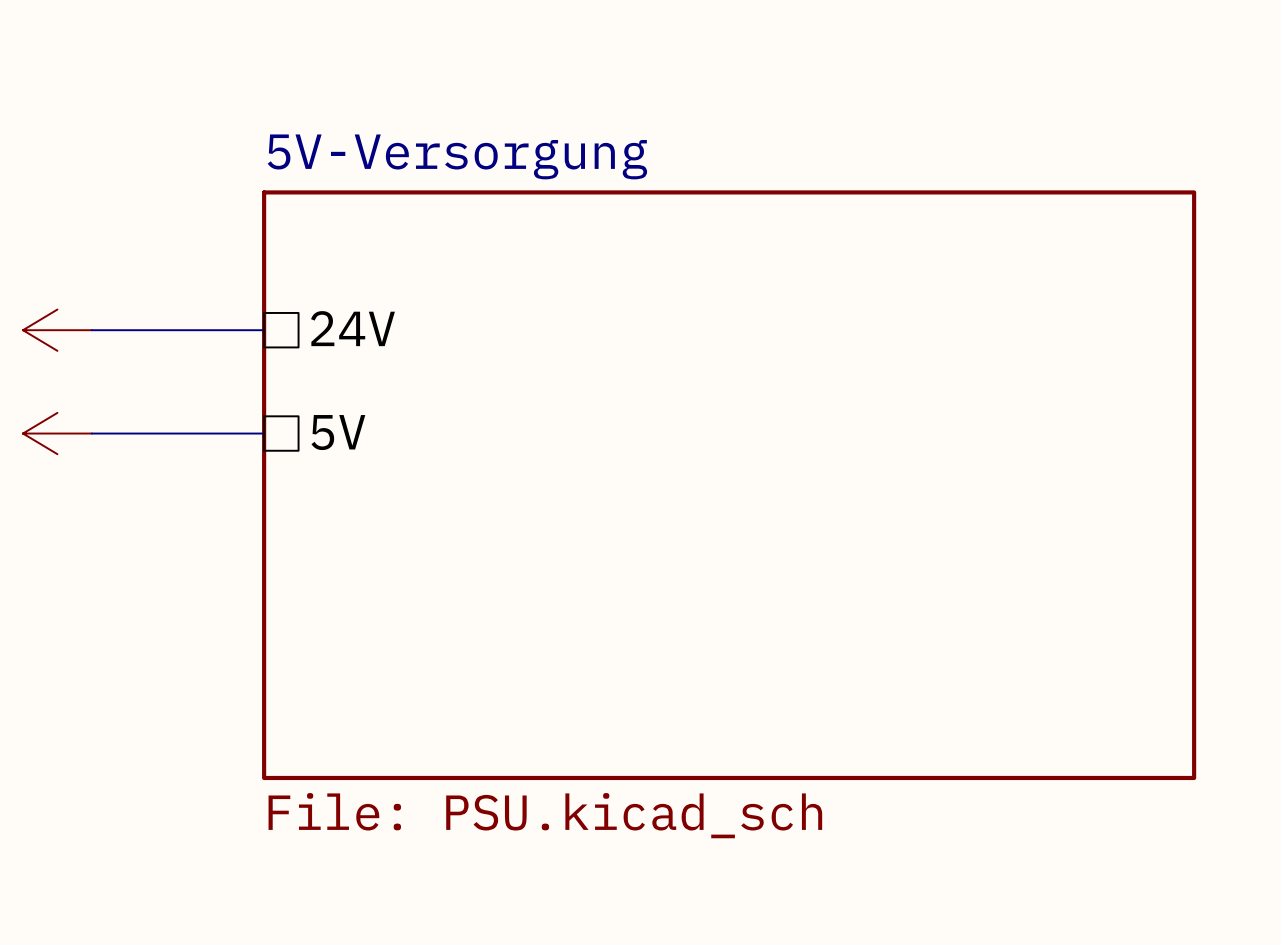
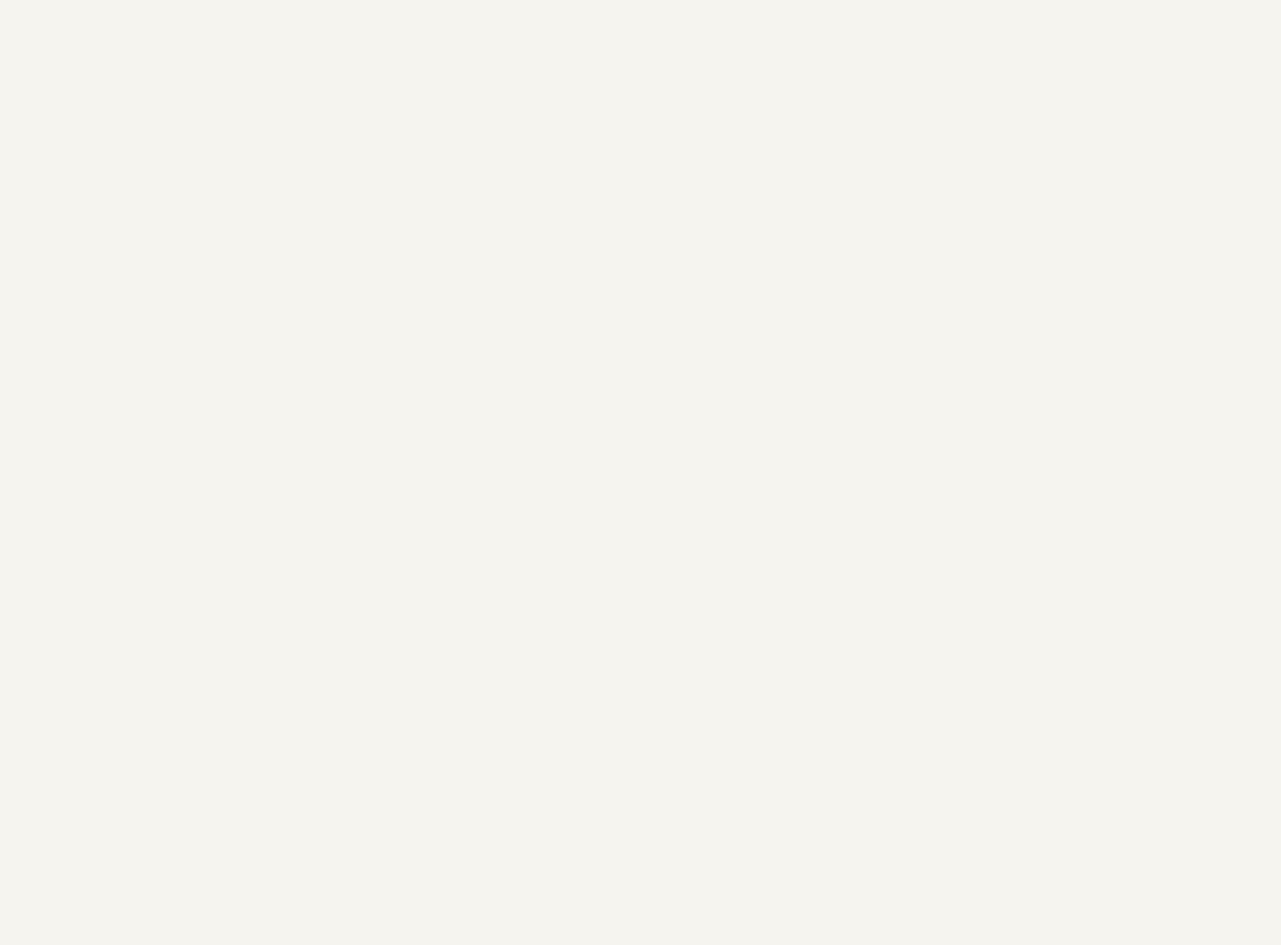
sheet pin: 24V (352, 328) -> none
power symbol: (57, 330) -> none
wire: (91, 330) (264, 330) -> none
sheet pin: 5V (338, 432) -> none
power symbol: (57, 433) -> none
wire: (91, 433) (264, 433) -> none
sheet 5V-Versorgung: File: PSU.kicad_sch (729, 485) -> none

